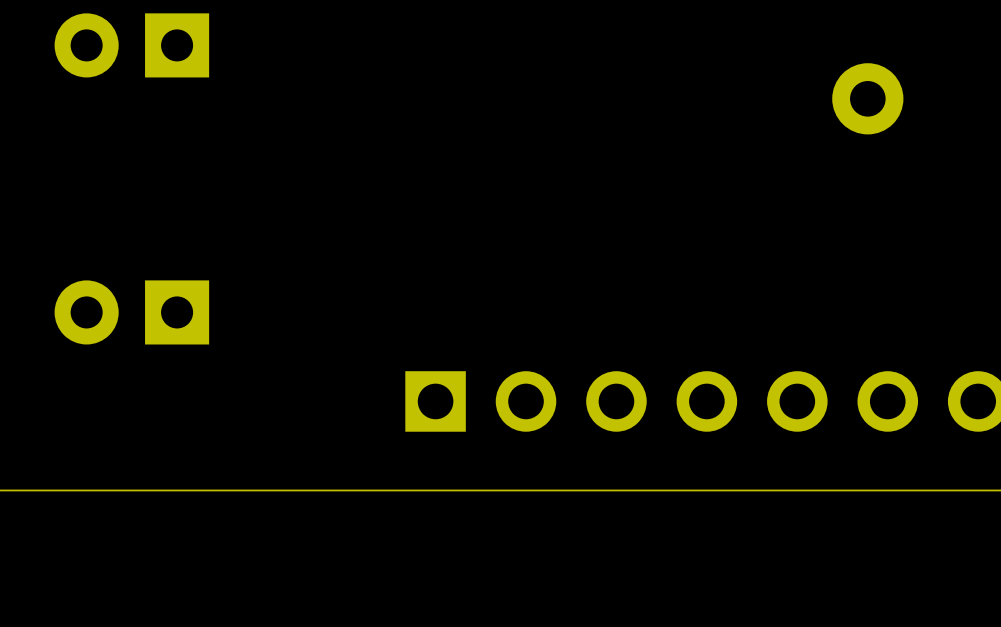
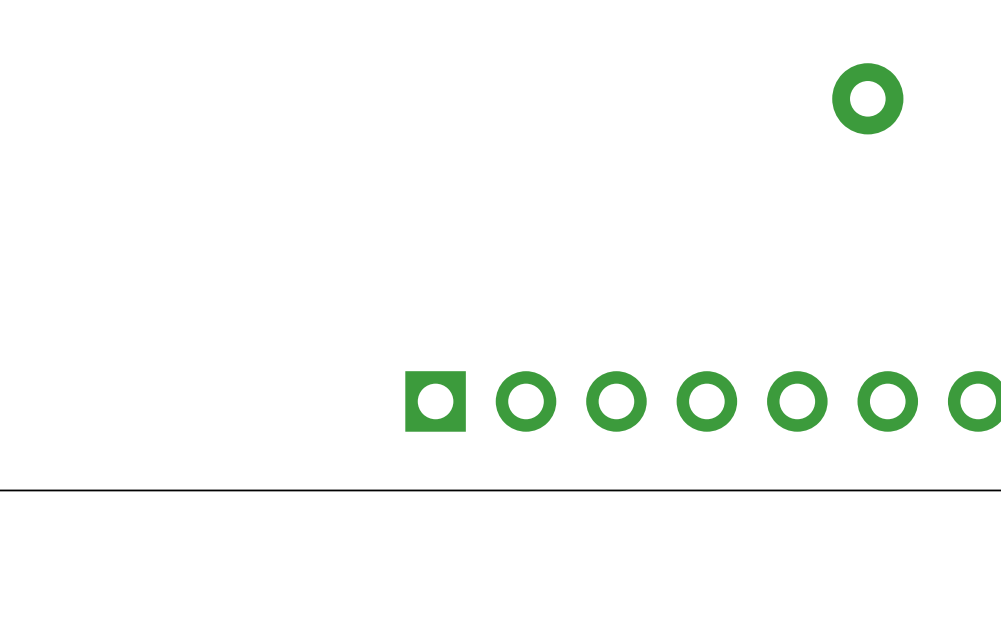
part: (131, 45) -> none
part: (131, 312) -> none

